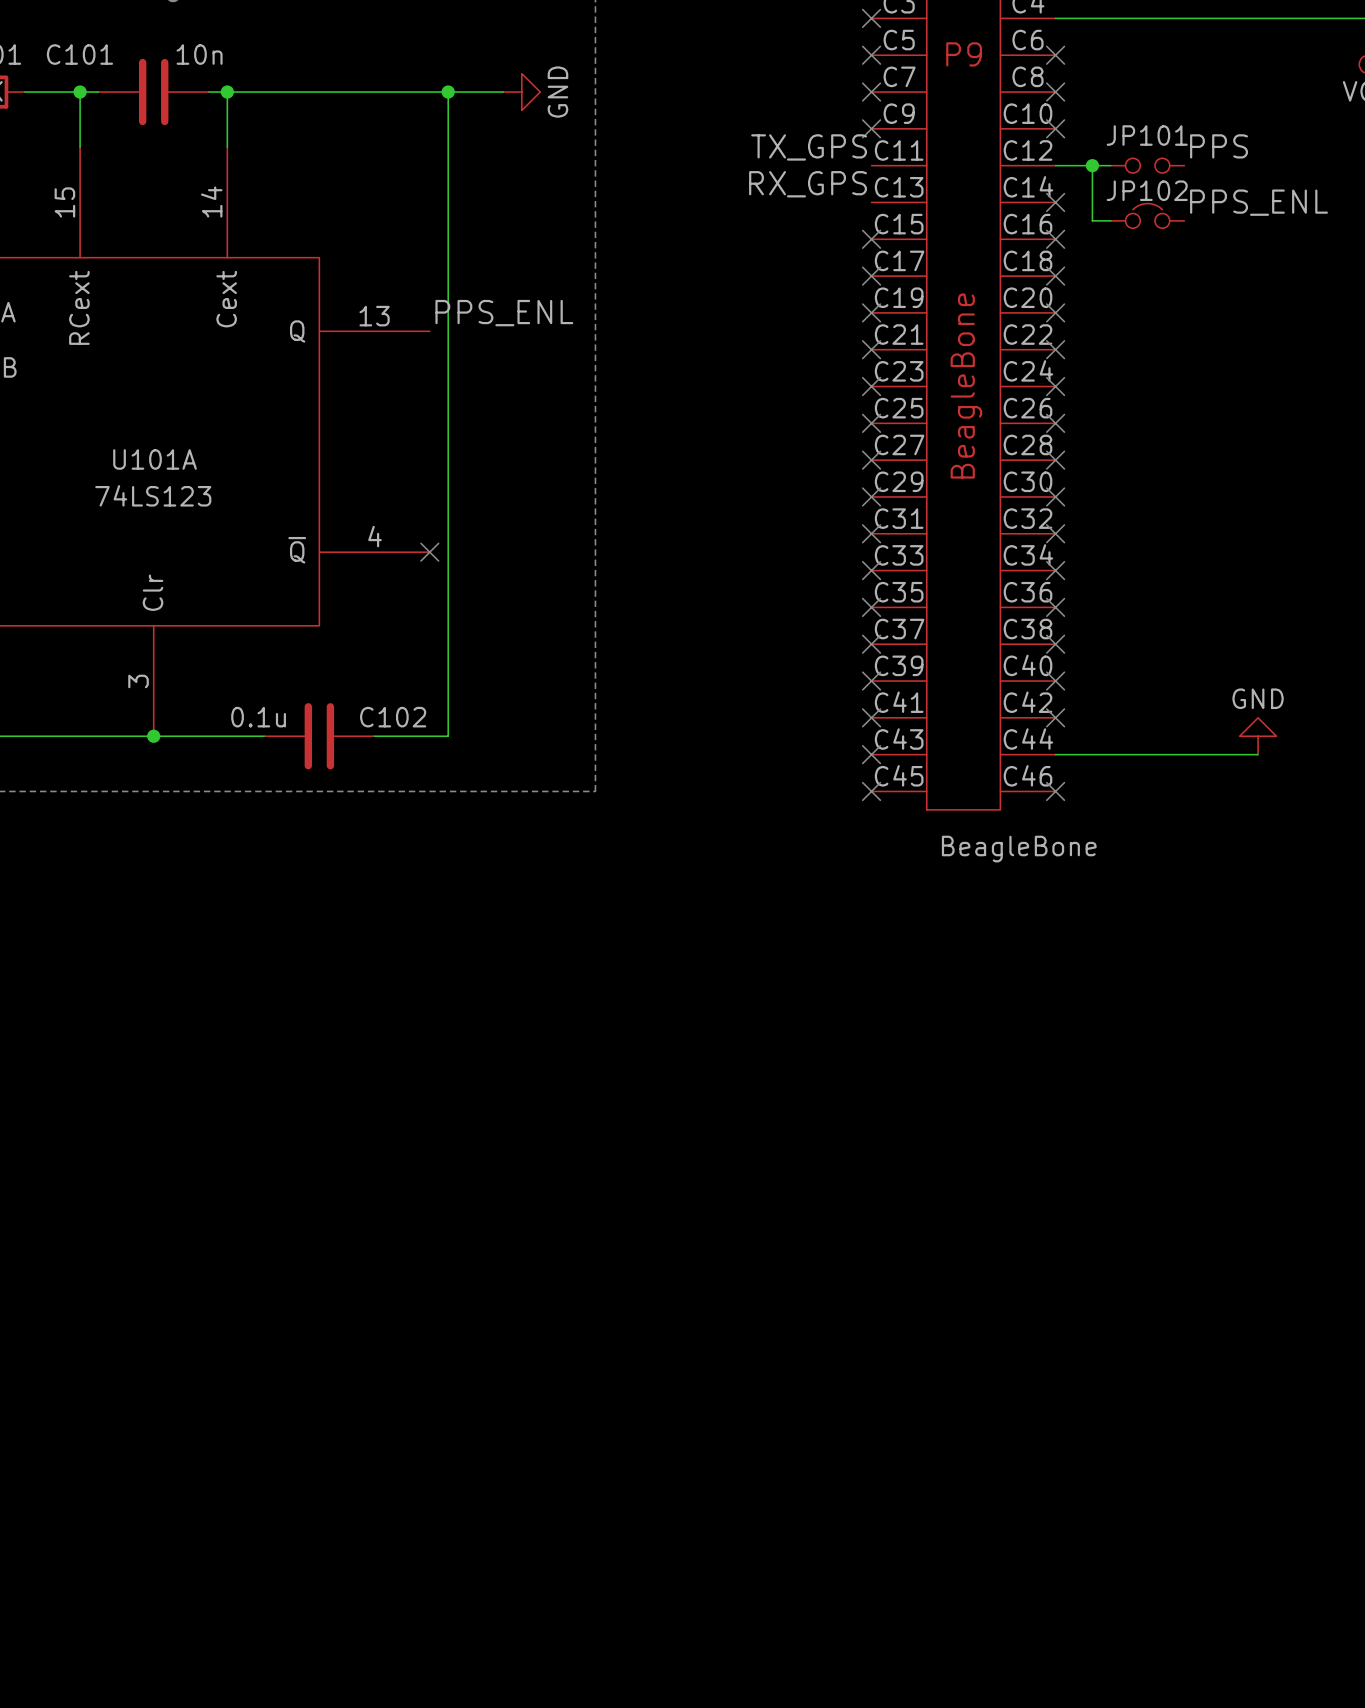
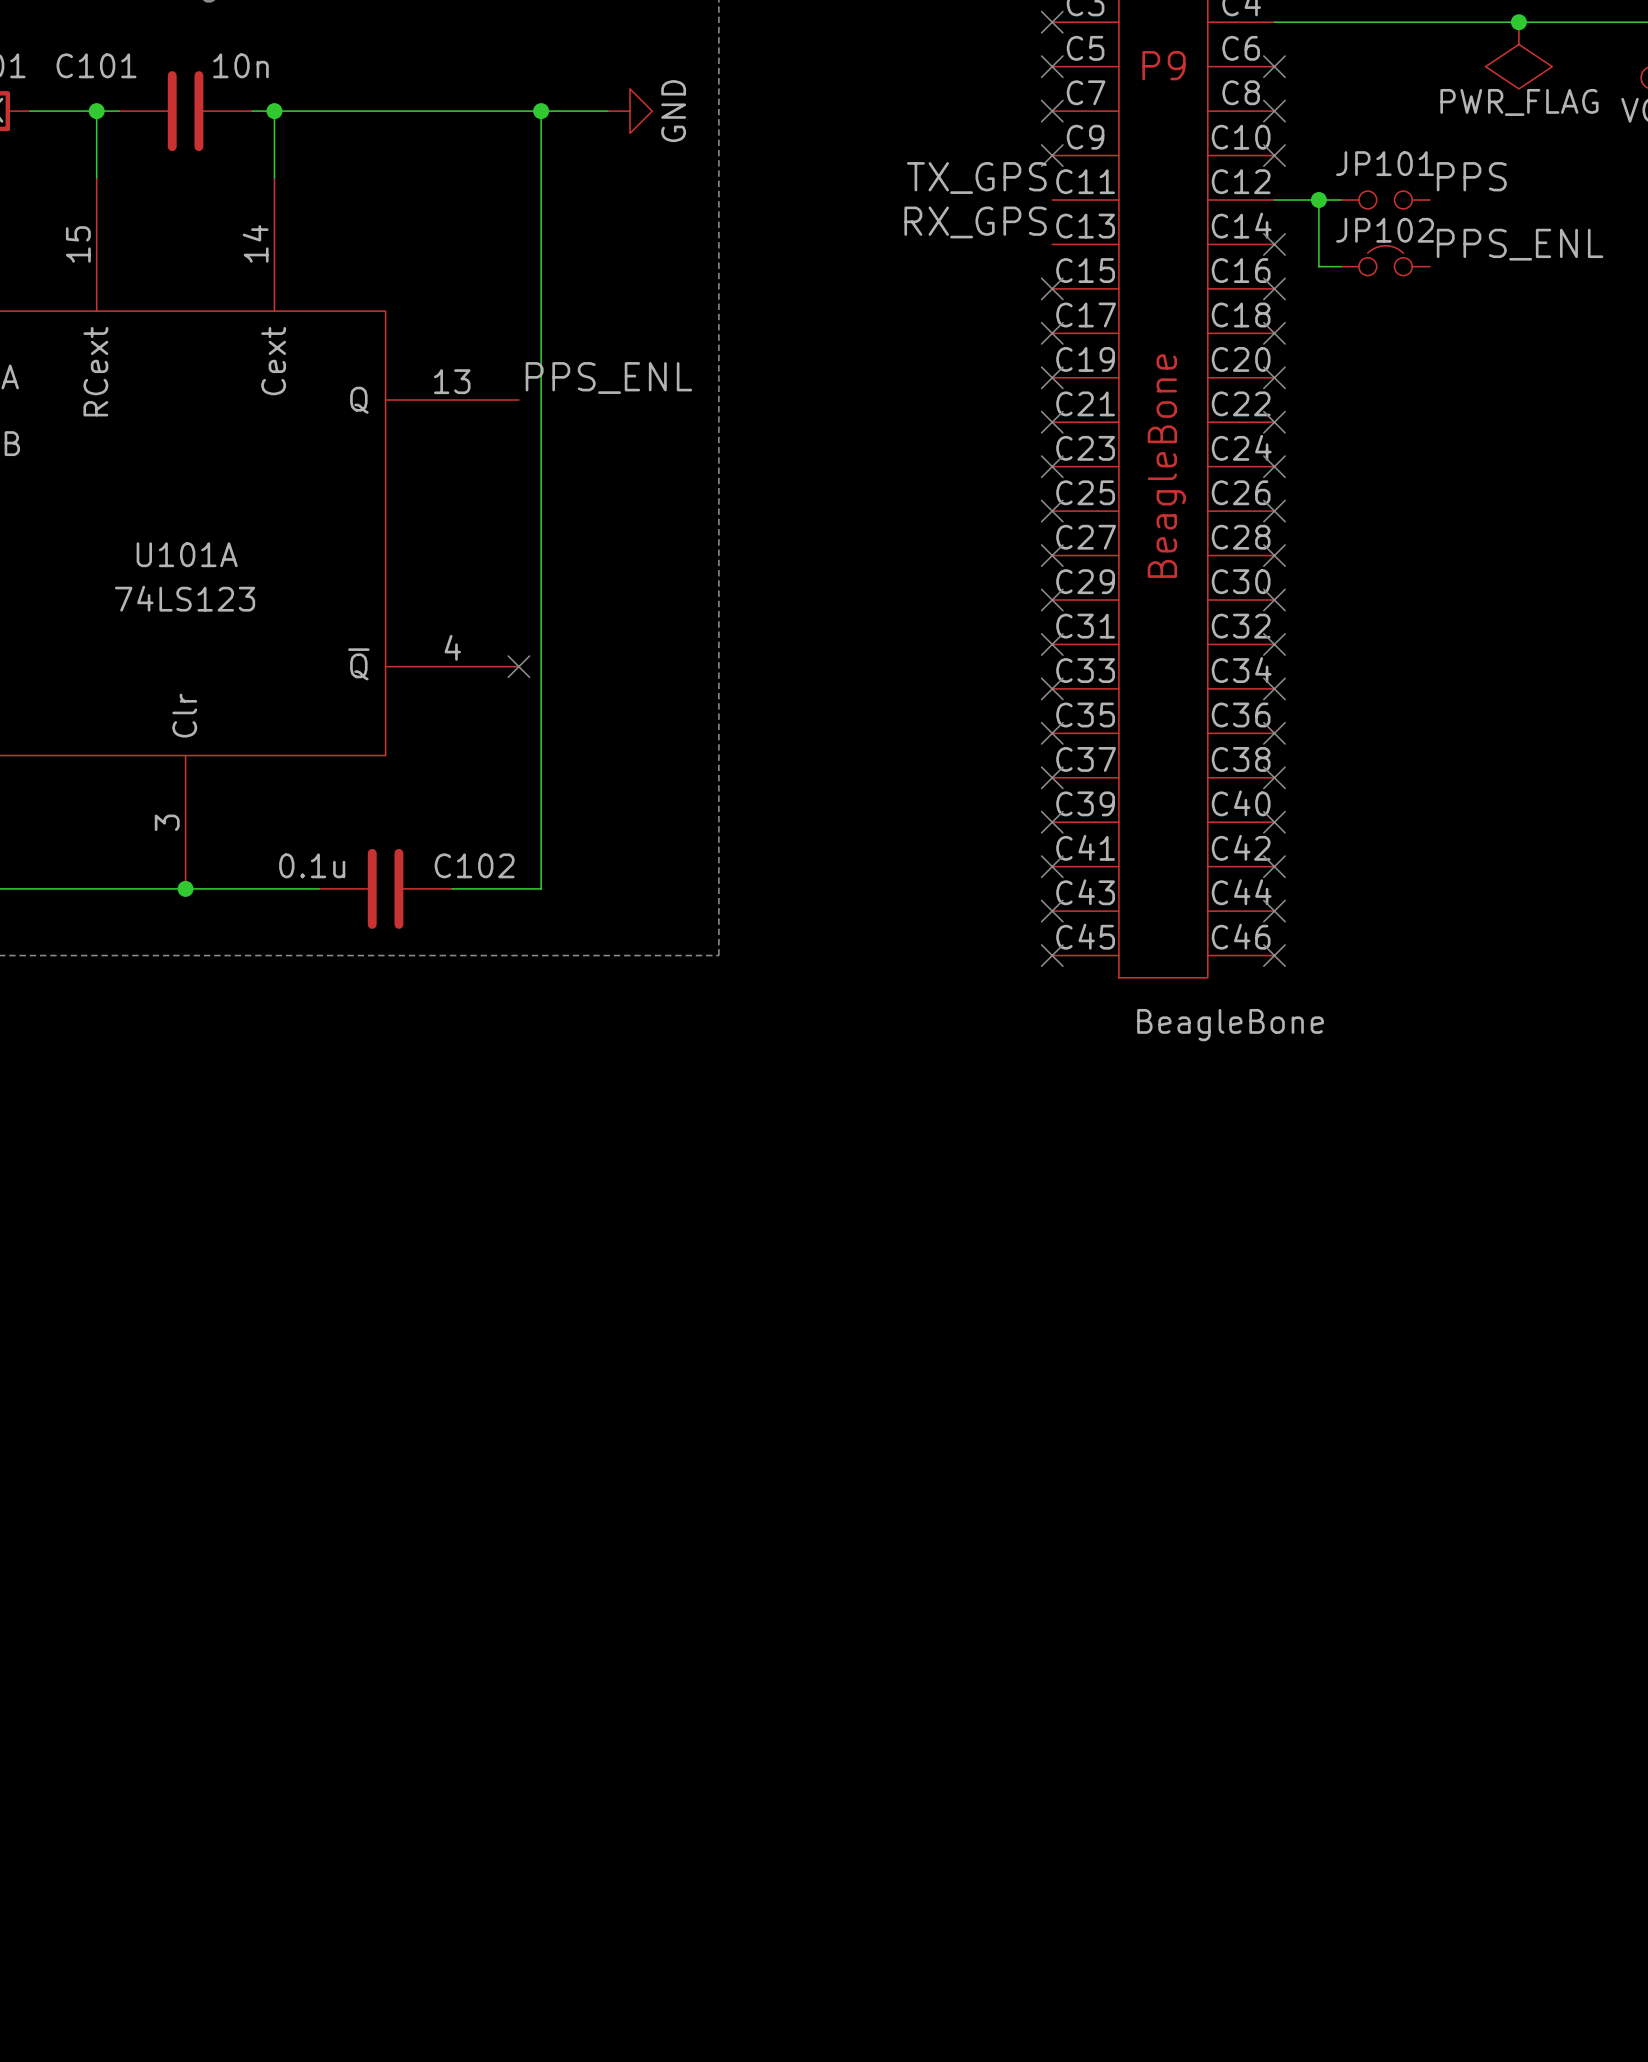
junction: none -> (1518, 22)
power symbol: none -> PWR_FLAG (1518, 55)
power symbol: GND (1258, 736) -> none
wire: (1055, 754) (1258, 754) -> none
no-connect mark: none -> (1274, 911)

